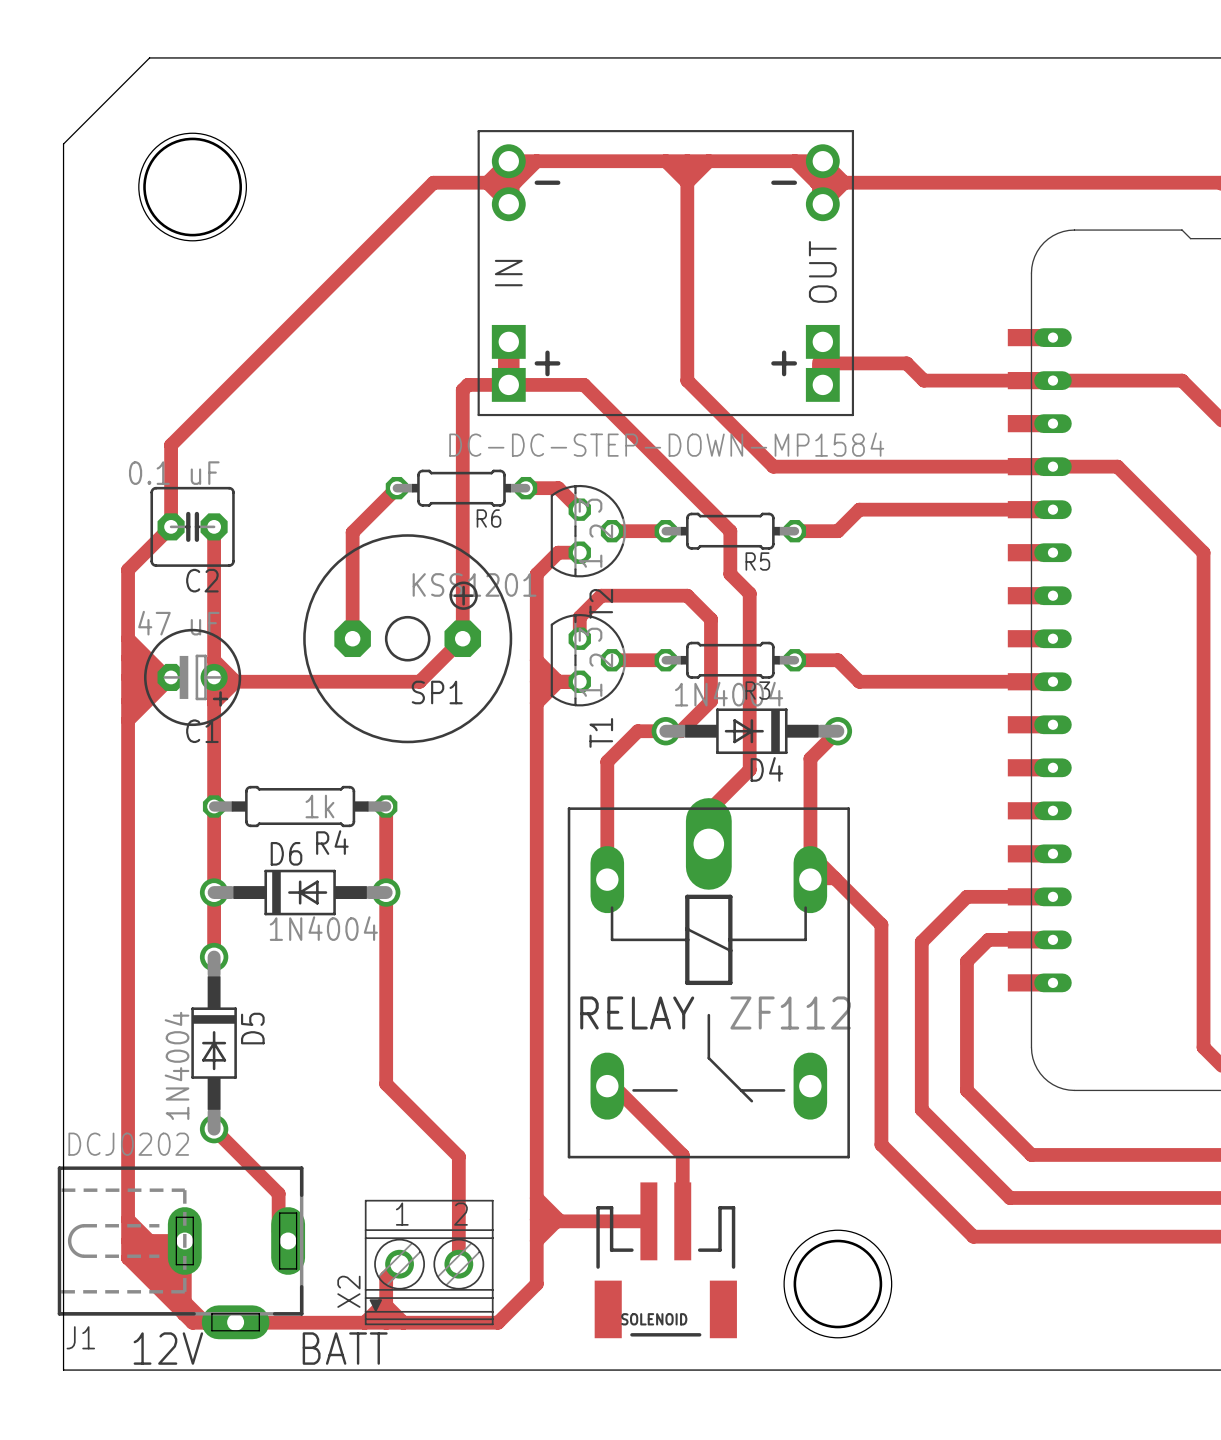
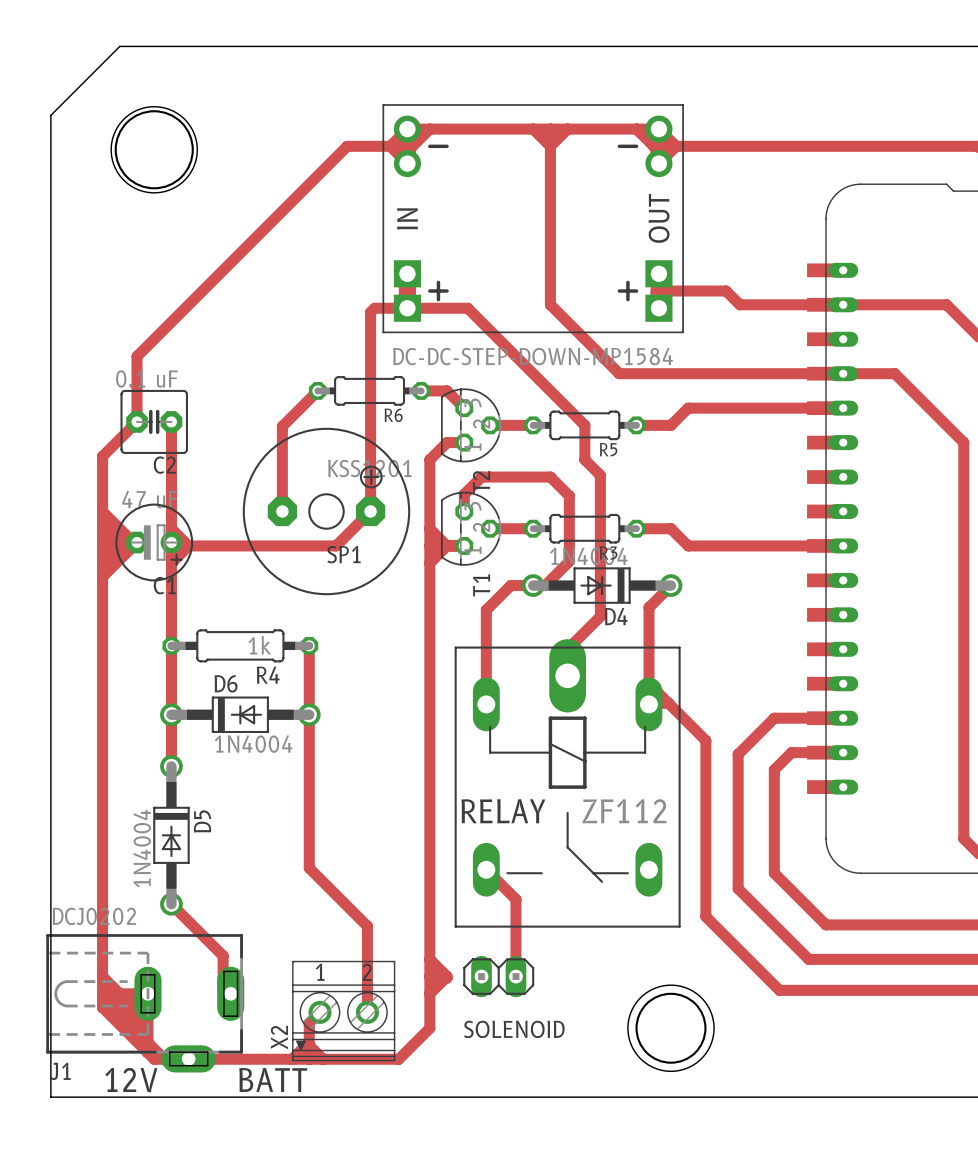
track: (607, 1086) (613, 1086) (682, 1155) (682, 1221) -> (486, 869) (515, 899) (515, 976)
SOLENOID: none -> (498, 976)
track: (558, 1221) (648, 1221) -> none
SOLENOID: (665, 1260) -> none

